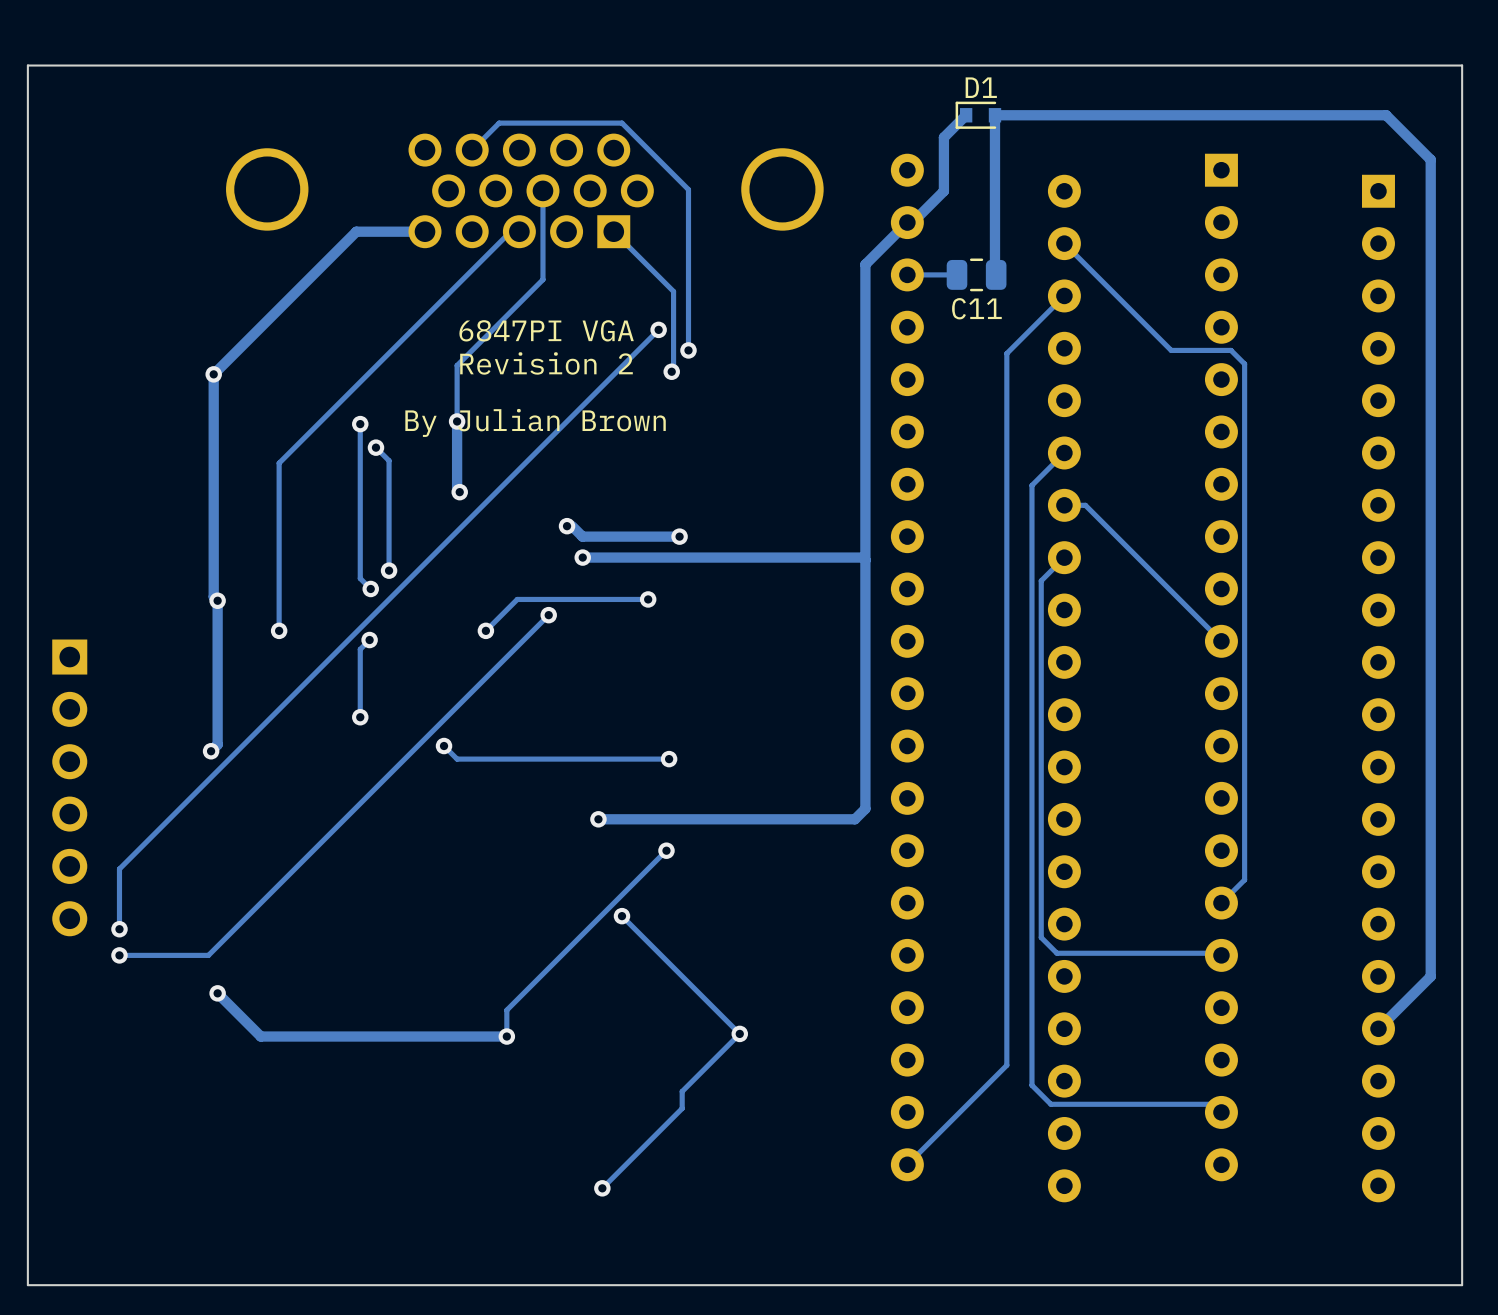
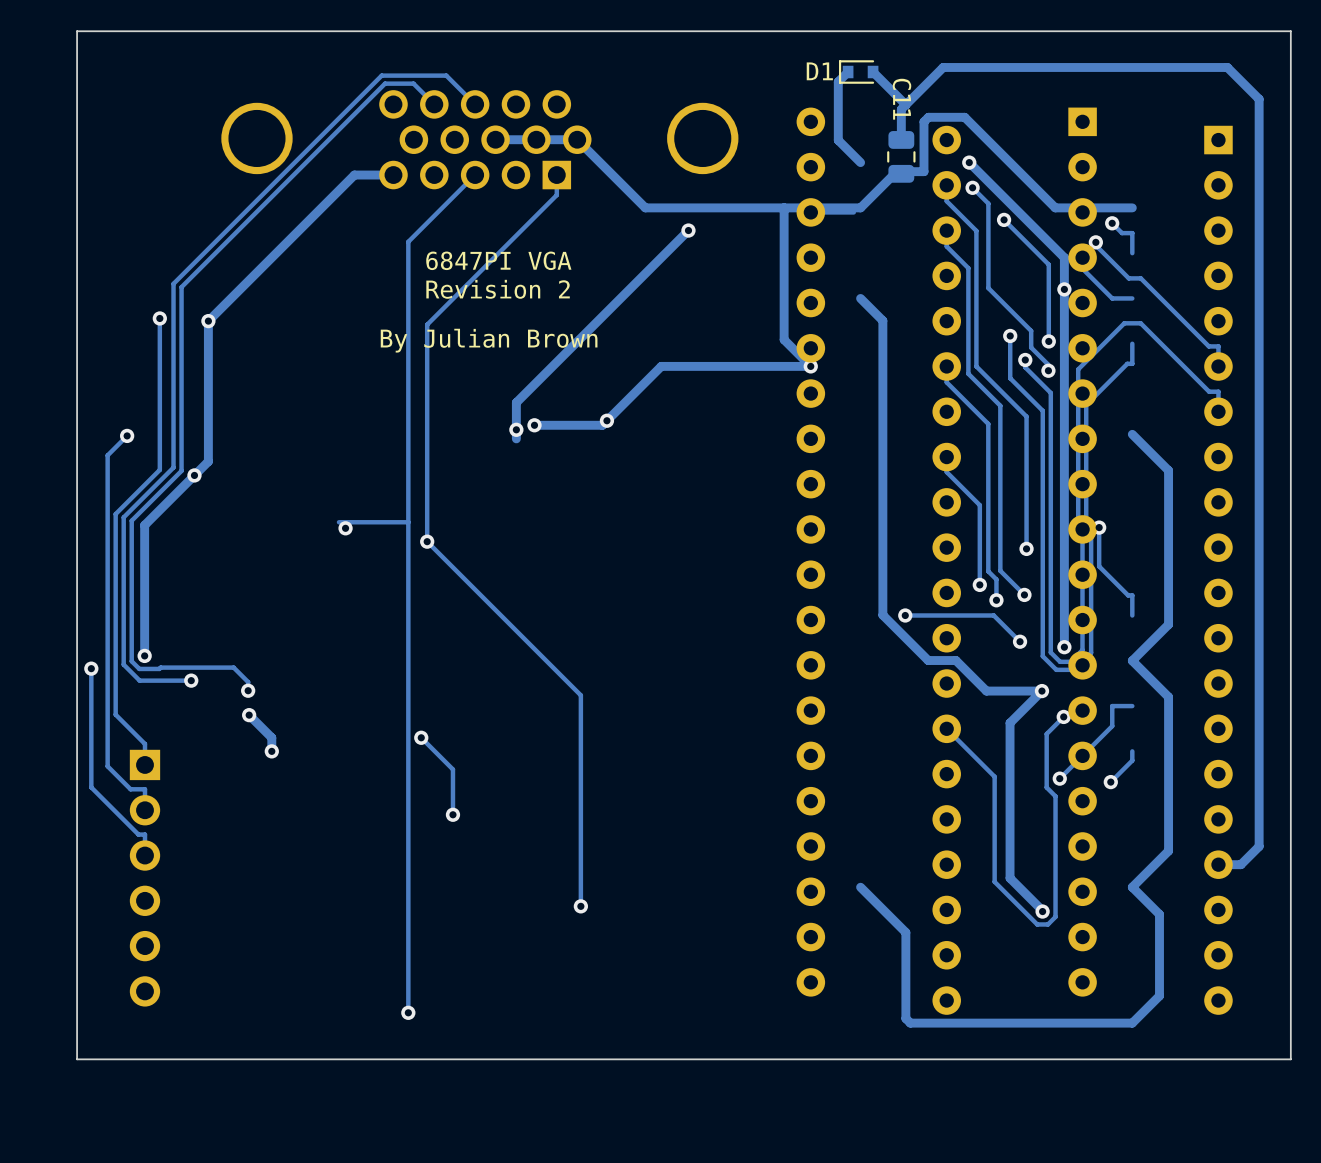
board edge: (59, 65) (27, 65) (27, 1285) (1462, 1285) (1462, 1253) -> (77, 31) (77, 1059) (1290, 1059)
D1 name position: D1 (981, 87) -> D1 (819, 71)
track: none -> (848, 72) (838, 81) (838, 140) (860, 162)
track: none -> (873, 72) (905, 104)
track: (966, 115) (943, 137) (943, 191) (912, 222) (907, 222) (865, 264) (865, 808) (854, 819) (598, 819) -> none
D1 position: (978, 115) -> (858, 72)
track: (472, 150) (499, 123) (621, 123) (688, 189) (688, 350) -> (434, 104) (413, 83) (385, 83) (181, 287) (181, 470) (131, 520) (131, 661) (139, 668) (233, 667) (248, 682) (248, 690)
track: none -> (475, 104) (446, 75) (381, 75) (173, 283) (173, 467) (123, 517) (123, 664) (139, 680) (191, 680)
track: (542, 190) (542, 279) (457, 365) (457, 489) (459, 492) -> (495, 139) (577, 139) (645, 207) (860, 207) (894, 173) (901, 173)
track: none -> (969, 162) (1064, 257) (1064, 647)
via: none -> (969, 162)
track: none -> (903, 171) (923, 171) (923, 121) (928, 117) (964, 117) (1055, 207) (1132, 207)
track: (379, 231) (356, 231) (213, 374) (213, 596) (217, 600) (217, 744) (211, 751) -> (354, 175) (208, 321) (208, 461) (144, 525) (144, 655)
track: (519, 231) (510, 231) (279, 463) (279, 630) -> (475, 175) (408, 241) (408, 1012)
track: (613, 231) (673, 291) (673, 369) (671, 371) -> (556, 175) (556, 195) (427, 324) (427, 541) (580, 695) (580, 906)
track: (1064, 243) (1171, 350) (1231, 350) (1244, 364) (1244, 879) (1221, 903) -> (946, 185) (946, 201) (976, 230) (976, 366) (1026, 416) (1026, 548)
track: none -> (972, 187) (988, 203) (988, 288) (1031, 330) (1031, 347) (1048, 364) (1048, 370)
via: none -> (972, 187)
track: none -> (784, 207) (784, 339) (810, 366) (661, 366) (602, 425) (534, 425)
C11 rotation: 0° (976, 274) -> 90° clockwise (901, 156)
C11 position: (976, 274) -> (901, 156)
track: (996, 274) (994, 115) (1386, 115) (1430, 159) (1430, 976) (1378, 1028) -> (901, 135) (901, 109) (943, 67) (1227, 67) (1259, 99) (1259, 846) (1240, 864) (1218, 864)
track: none -> (1004, 219) (1048, 264) (1048, 341)
via: none -> (1004, 219)
track: none -> (1112, 223) (1122, 233) (1132, 233) (1132, 253)
via: none -> (1112, 223)
track: none -> (688, 230) (516, 402) (516, 438)
via: none -> (688, 230)
track: (1064, 295) (1006, 353) (1006, 1065) (907, 1164) -> (946, 230) (946, 246) (968, 268) (968, 373) (1000, 405) (1000, 570) (1024, 594)
C11 name position: C11 (976, 308) -> C11 (901, 99)
track: none -> (1095, 242) (1095, 245) (1128, 278) (1140, 278) (1208, 346) (1218, 346) (1218, 366)
via: none -> (1095, 242)
track: none -> (1079, 251) (1079, 265) (1112, 298) (1132, 298)
track: (658, 329) (119, 869) (119, 929) -> none
via: (658, 329) -> none
via: (688, 350) -> none
via: none -> (1064, 289)
via: (671, 371) -> none
via position: (213, 374) -> (208, 321)
track: none -> (860, 298) (882, 320) (882, 615) (928, 660) (955, 660) (986, 691) (1041, 691) (1010, 723) (1010, 878) (1042, 911)
track: none -> (159, 318) (159, 469) (115, 514) (115, 714) (144, 744) (144, 764)
via: none -> (159, 318)
track: none -> (1010, 335) (1010, 378) (1042, 410) (1042, 656) (1056, 669) (1074, 669) (1091, 652) (1091, 537) (1086, 532) (1086, 404) (1127, 363) (1132, 363) (1132, 343)
via: none -> (1010, 335)
via: (457, 421) -> none
track: (360, 424) (360, 578) (370, 588) -> none
via: (360, 424) -> none
via: none -> (1048, 341)
track: none -> (1025, 360) (1025, 367) (1050, 392) (1050, 652) (1060, 661) (1070, 661) (1082, 650) (1082, 540) (1078, 536) (1078, 369) (1124, 323) (1140, 323) (1209, 391) (1218, 391) (1218, 411)
via: none -> (1025, 360)
track: (375, 447) (389, 460) (389, 570) -> none
via: (375, 447) -> none
via: none -> (810, 366)
track: (1064, 452) (1031, 485) (1031, 1085) (1050, 1104) (1213, 1104) (1221, 1112) -> (946, 366) (946, 382) (988, 423) (988, 571) (996, 579) (996, 600)
via: none -> (1048, 370)
via: (459, 492) -> none
track: (1064, 505) (1085, 505) (1221, 641) -> none
track: (567, 526) (572, 526) (582, 536) (679, 536) -> none
track: none -> (1132, 434) (1168, 470) (1168, 624) (1132, 660) (1168, 697) (1168, 851) (1132, 887) (1159, 914) (1159, 995) (1132, 1023) (910, 1023) (905, 1018) (905, 932) (860, 887)
track: none -> (127, 435) (107, 455) (107, 766) (130, 789) (144, 789) (144, 810)
via: none -> (127, 435)
via position: (679, 536) -> (606, 420)
track: (582, 557) (862, 557) (865, 560) -> none
via position: (582, 557) -> (534, 425)
track: (1064, 557) (1041, 580) (1041, 937) (1056, 953) (1219, 953) (1221, 955) -> (946, 457) (946, 472) (979, 505) (979, 584)
via: (389, 570) -> none
via: (370, 588) -> none
track: (648, 599) (517, 599) (485, 630) -> none
via: (648, 599) -> none
via position: (217, 600) -> (194, 475)
track: (548, 615) (208, 955) (119, 955) -> none
via: (548, 615) -> none
via: (279, 630) -> none
via position: (485, 630) -> (427, 541)
track: none -> (408, 522) (338, 522)
track: none -> (1099, 527) (1099, 566) (1128, 595) (1132, 595) (1132, 615)
via: none -> (1099, 527)
track: (369, 640) (360, 649) (360, 717) -> none
via: none -> (1026, 548)
via: none -> (979, 584)
via: (360, 717) -> none
via: none -> (1024, 594)
via: none -> (996, 600)
track: none -> (905, 615) (993, 615) (1020, 641)
via: none -> (905, 615)
track: (444, 746) (457, 759) (669, 759) -> none
via: (444, 746) -> none
via: (211, 751) -> none
via: (669, 759) -> none
via: none -> (1020, 641)
via: none -> (1064, 647)
part position: (69, 787) -> (144, 878)
via: none -> (144, 655)
track: none -> (91, 668) (91, 787) (138, 834) (144, 834) (144, 855)
via: none -> (91, 668)
via: none -> (191, 680)
via: (598, 819) -> none
via: none -> (248, 690)
via: none -> (1041, 691)
track: none -> (1132, 706) (1112, 706) (1112, 726) (1059, 778)
track: (666, 850) (506, 1010) (506, 1036) (260, 1036) (217, 993) -> none
via: (666, 850) -> none
track: none -> (249, 715) (271, 737) (271, 751)
via: none -> (249, 715)
track: none -> (1063, 716) (1046, 733) (1046, 787) (1055, 796) (1055, 916) (1047, 924) (1037, 924) (994, 881) (994, 776) (946, 728)
via: none -> (1063, 716)
track: none -> (421, 737) (452, 769) (452, 814)
via: none -> (421, 737)
via: none -> (271, 751)
track: none -> (1132, 751) (1132, 760) (1110, 782)
track: (621, 916) (739, 1033) (682, 1091) (682, 1108) (602, 1188) -> none
via: (621, 916) -> none
via: (119, 929) -> none
via: none -> (1059, 778)
via: none -> (1110, 782)
via: (119, 955) -> none
via: (217, 993) -> none
via: (739, 1033) -> none
via position: (506, 1036) -> (452, 814)
via: none -> (580, 906)
via: none -> (1042, 911)
via: (602, 1188) -> none
via: none -> (408, 1012)

